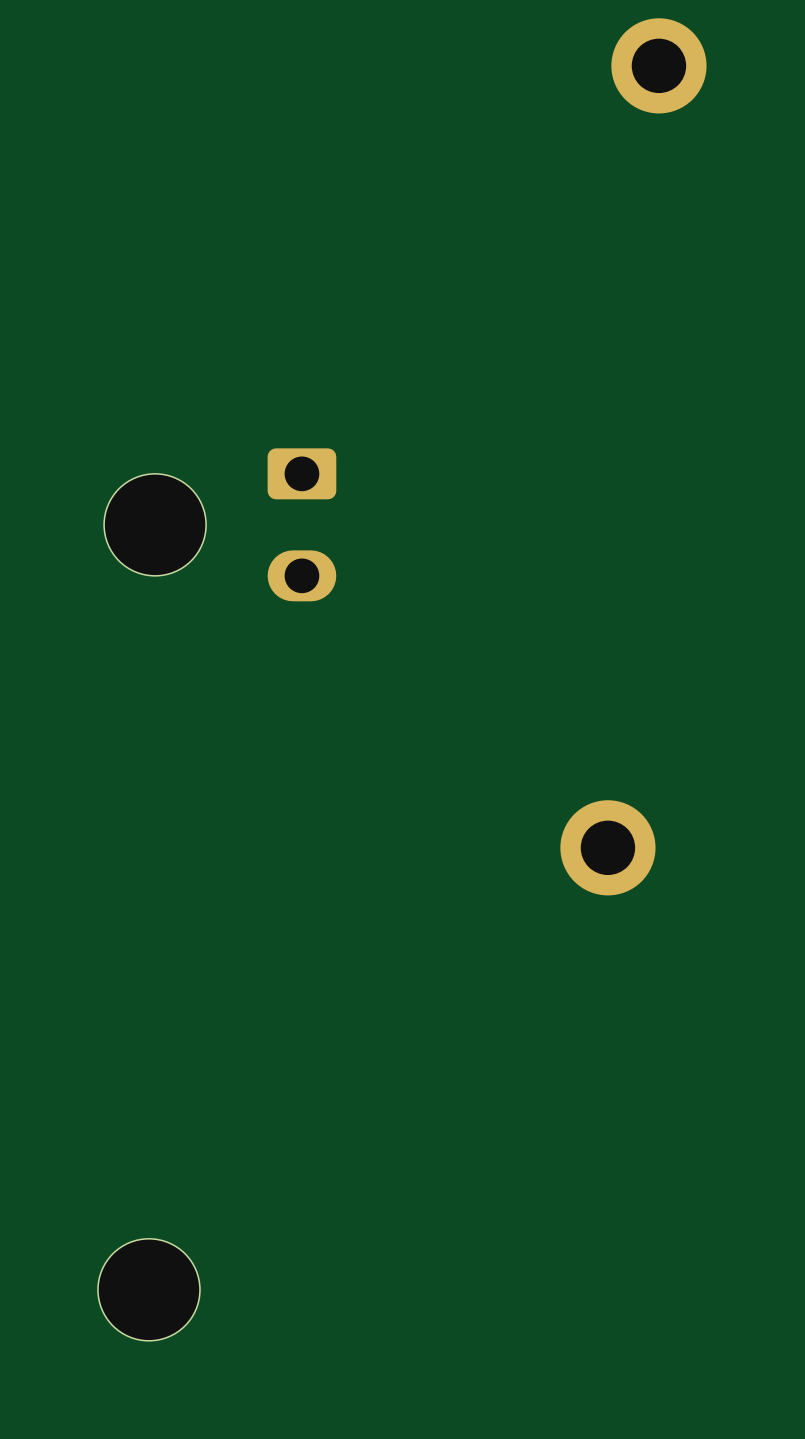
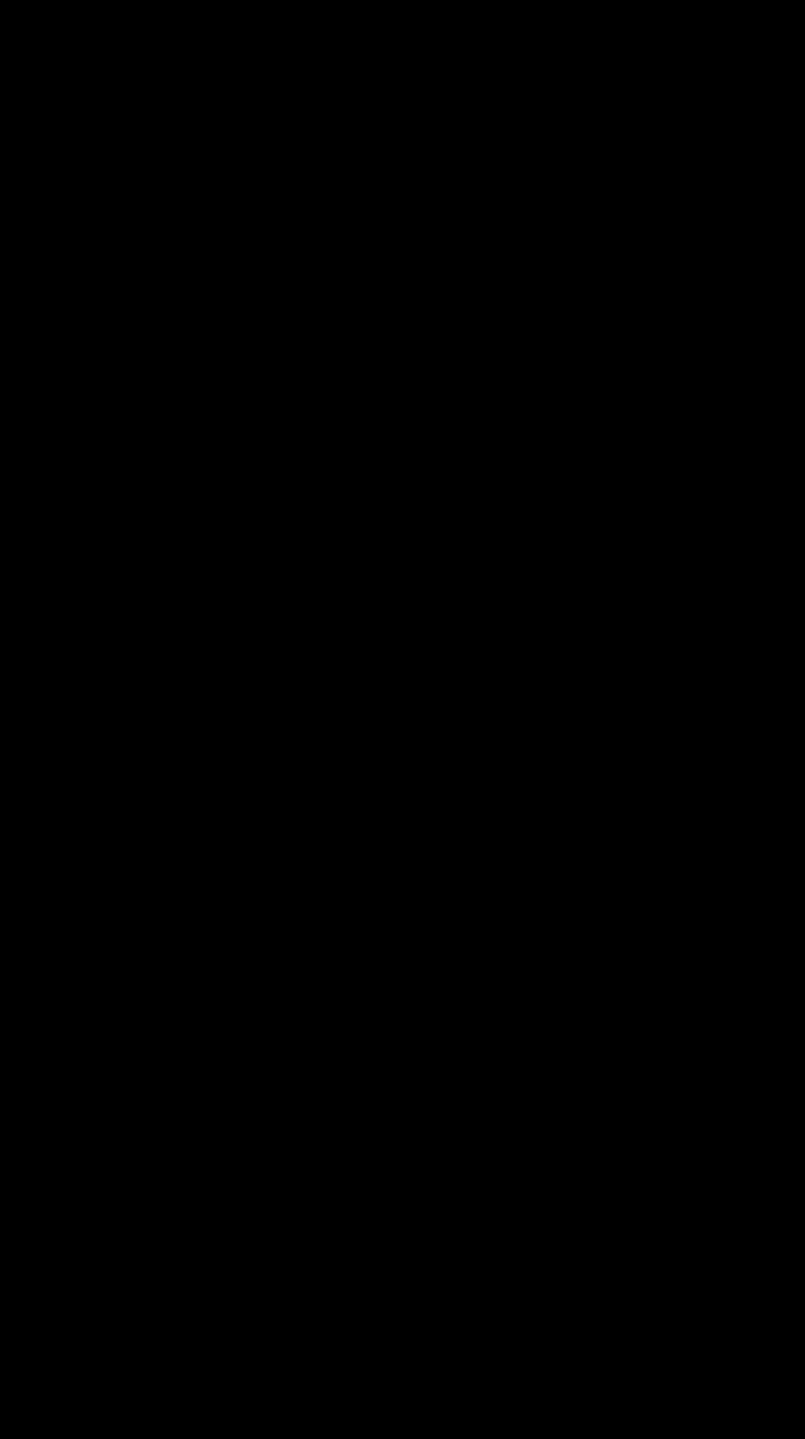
part: (658, 65) -> none
part: (220, 524) -> none
part: (607, 847) -> none
part: (148, 1289) -> none

